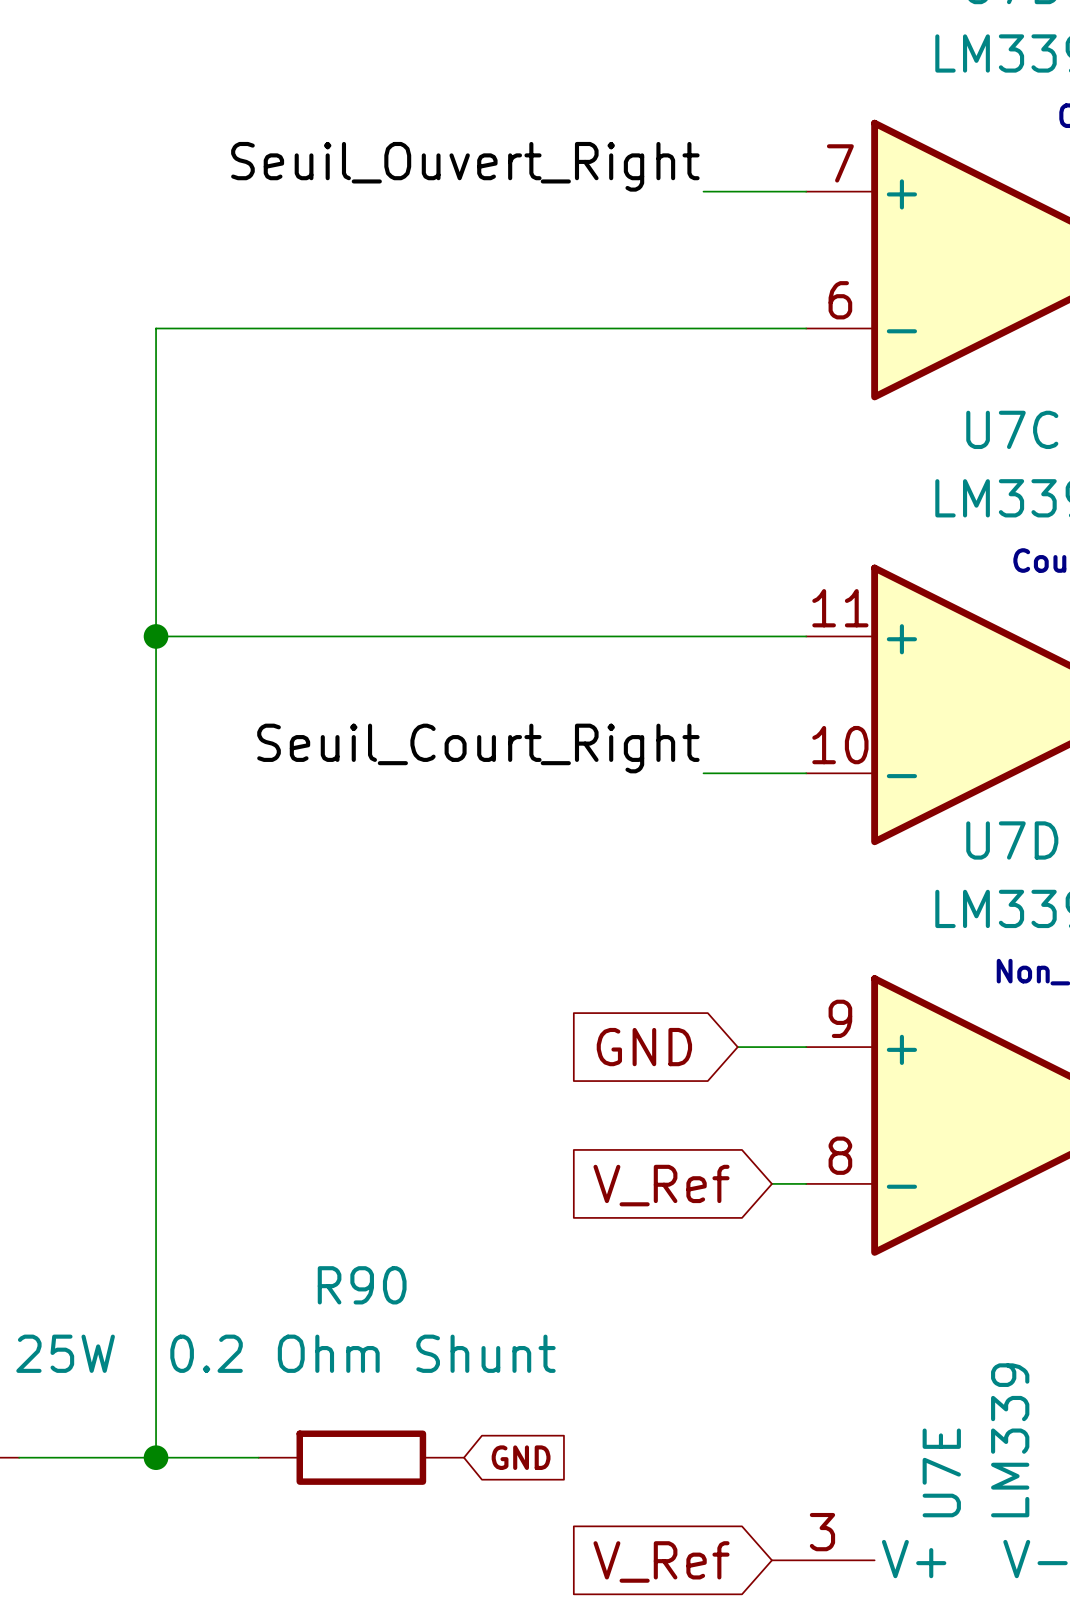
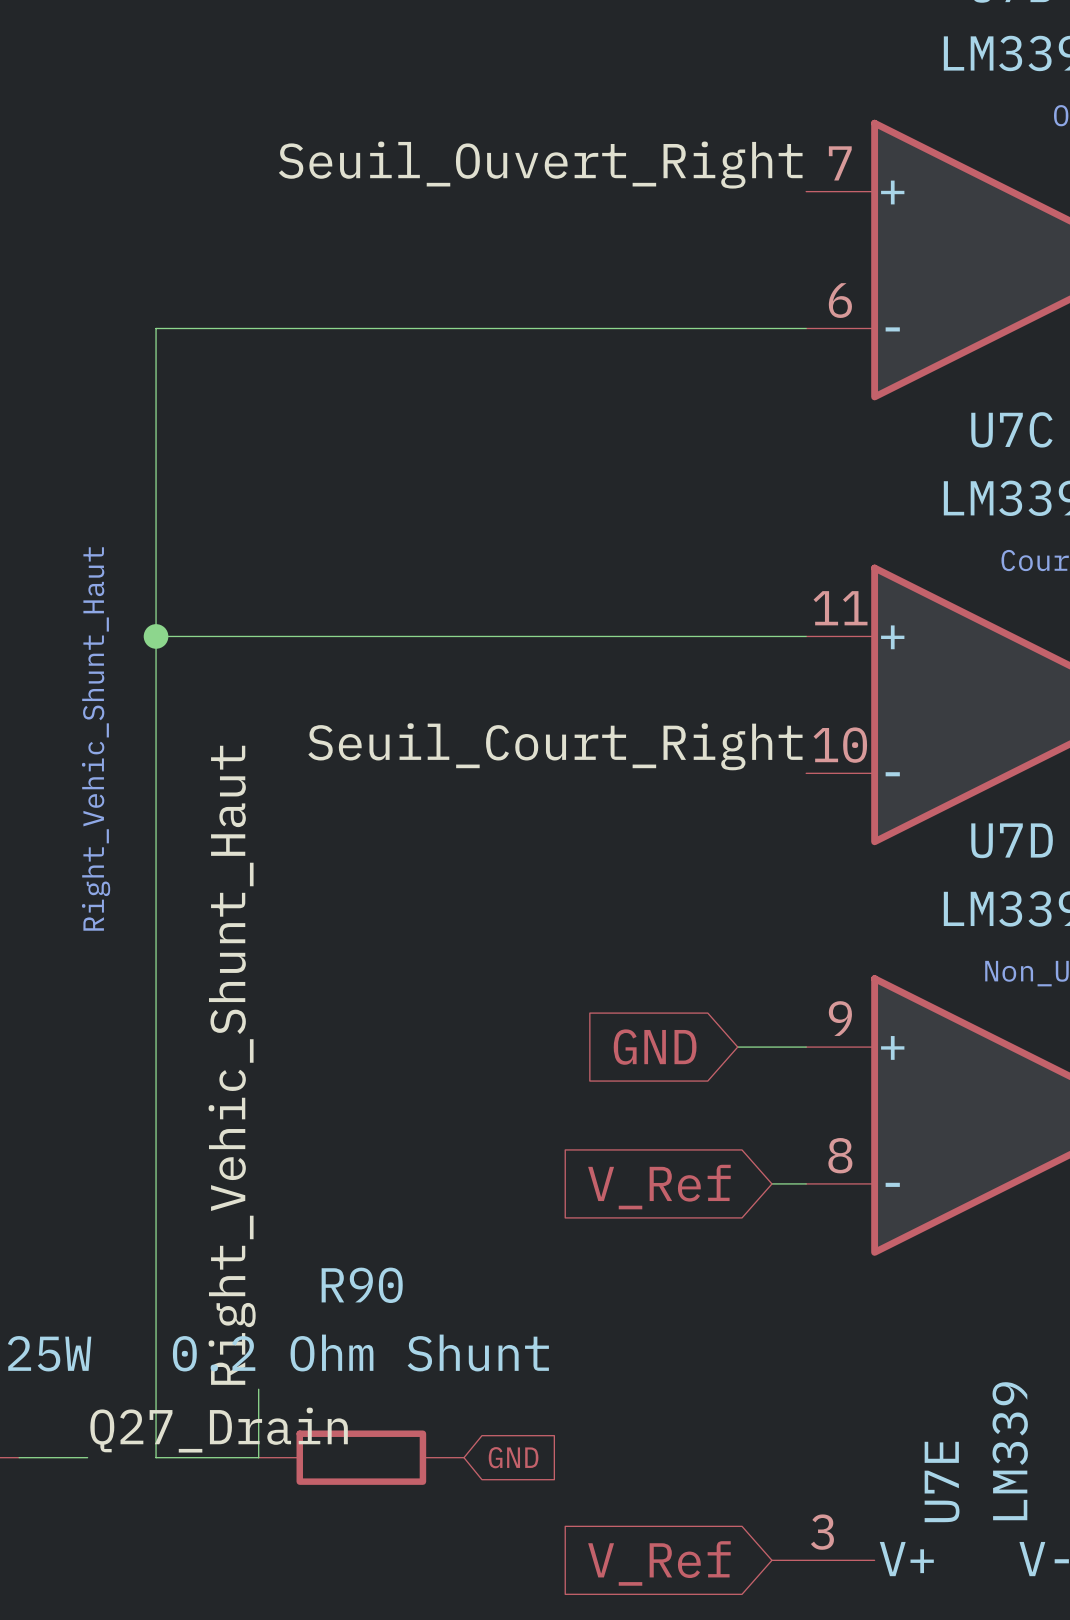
label position: Seuil_Ouvert_Right (465, 166) -> Seuil_Ouvert_Right (540, 165)
wire: (703, 191) (806, 191) -> none
text: none -> Right_Vehic_Shunt_Haut (96, 738)
label position: Seuil_Court_Right (478, 748) -> Seuil_Court_Right (555, 746)
wire: (703, 773) (806, 773) -> none
label: none -> Right_Vehic_Shunt_Haut (232, 1065)
wire: none -> (258, 1389) (258, 1457)
label: none -> Q27_Drain (219, 1430)
wire: (87, 1457) (156, 1457) -> none
junction: (156, 1457) -> none

